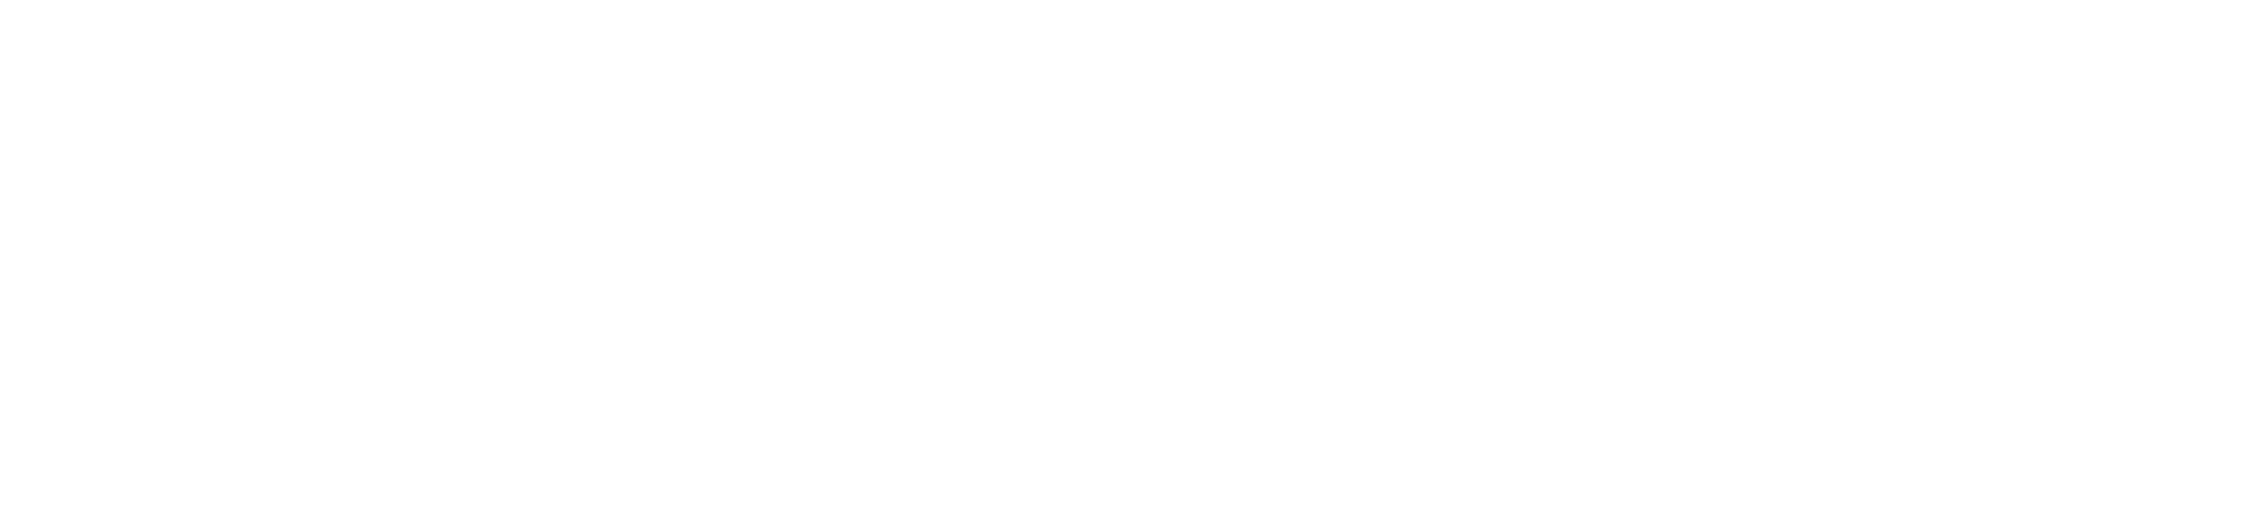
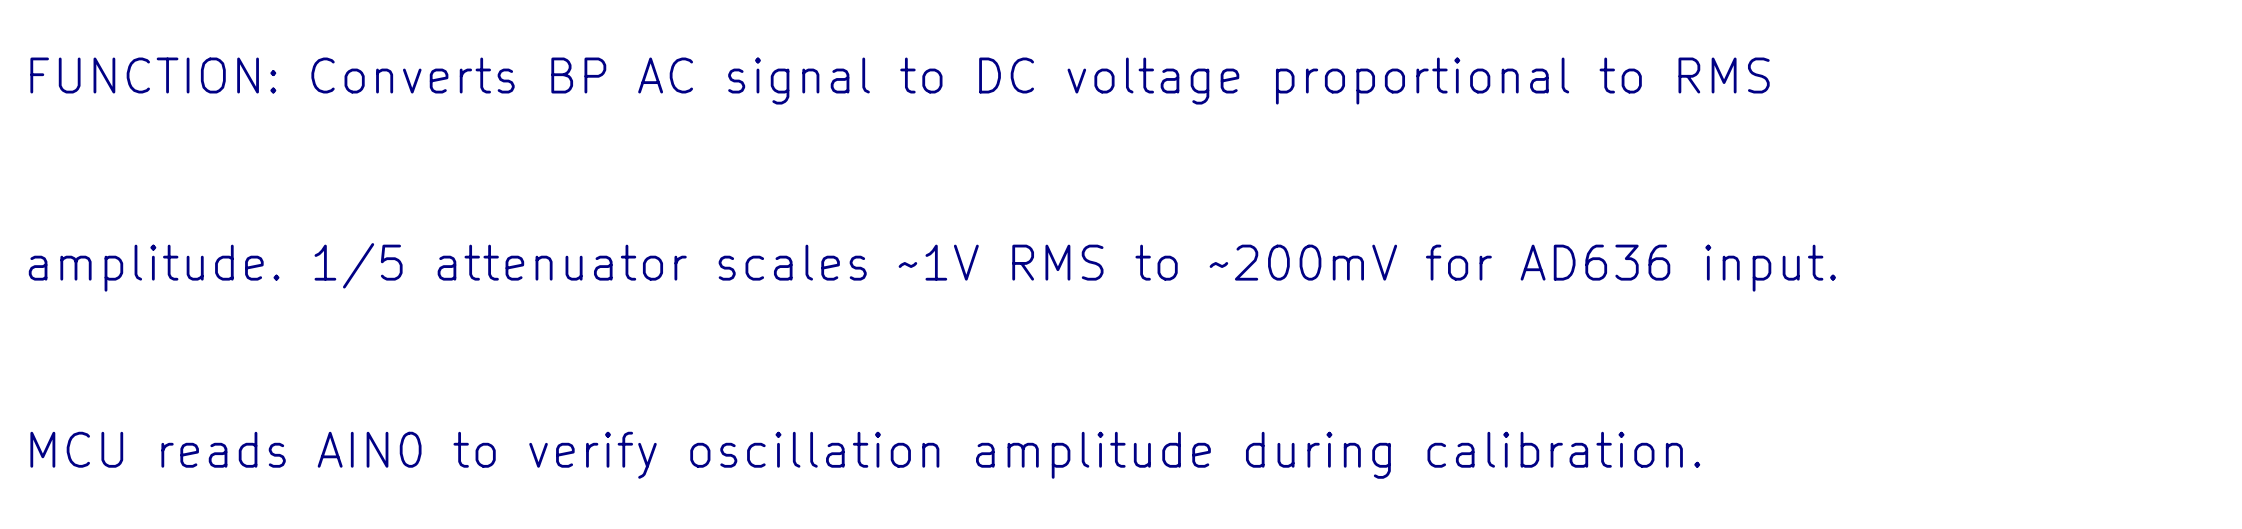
text: none -> FUNCTION: Converts BP AC signal to DC voltage proportional to RMS (900, 81)
text: none -> amplitude. 1/5 attenuator scales ~1V RMS to ~200mV for AD636 input. (932, 267)
text: none -> MCU reads AIN0 to verify oscillation amplitude during calibration. (865, 455)

